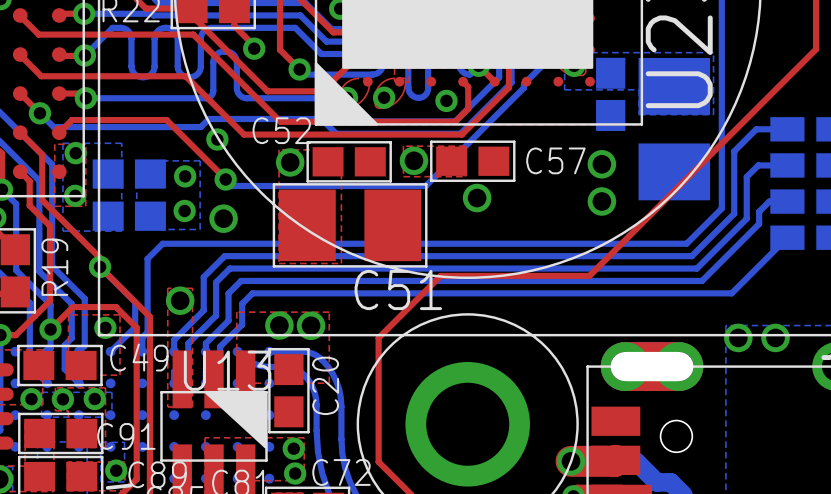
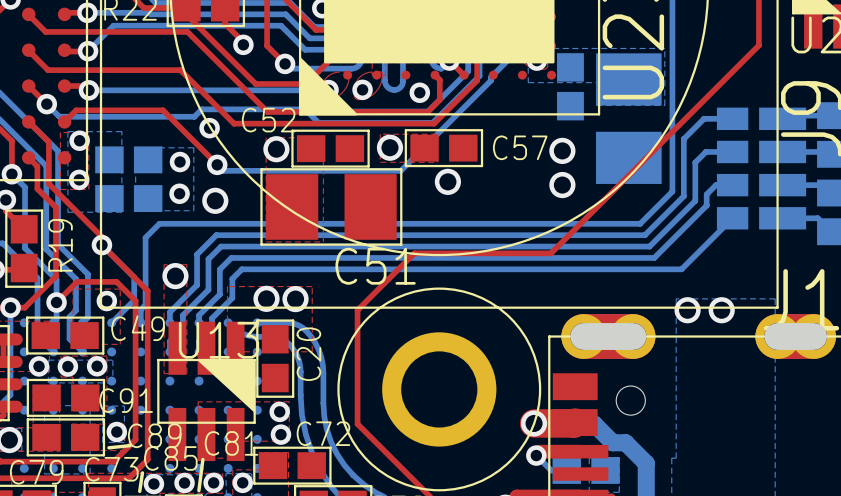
bottom track: (120, 27) (127, 30) (130, 34) (131, 69) (135, 74) (142, 77) (149, 75) (153, 70) (154, 35) (158, 30) (165, 27) -> (120, 25) (161, 25)
bottom track: (166, 27) (173, 30) (176, 34) (178, 69) (181, 74) (188, 77) (195, 75) (200, 70) (201, 35) (205, 30) (211, 27) -> (163, 25) (204, 25)
bottom track: (205, 98) (210, 96) (213, 92) (214, 58) (218, 52) (224, 51) (231, 52) (236, 58) (237, 90) (240, 96) (246, 98) -> (199, 90) (236, 90)

